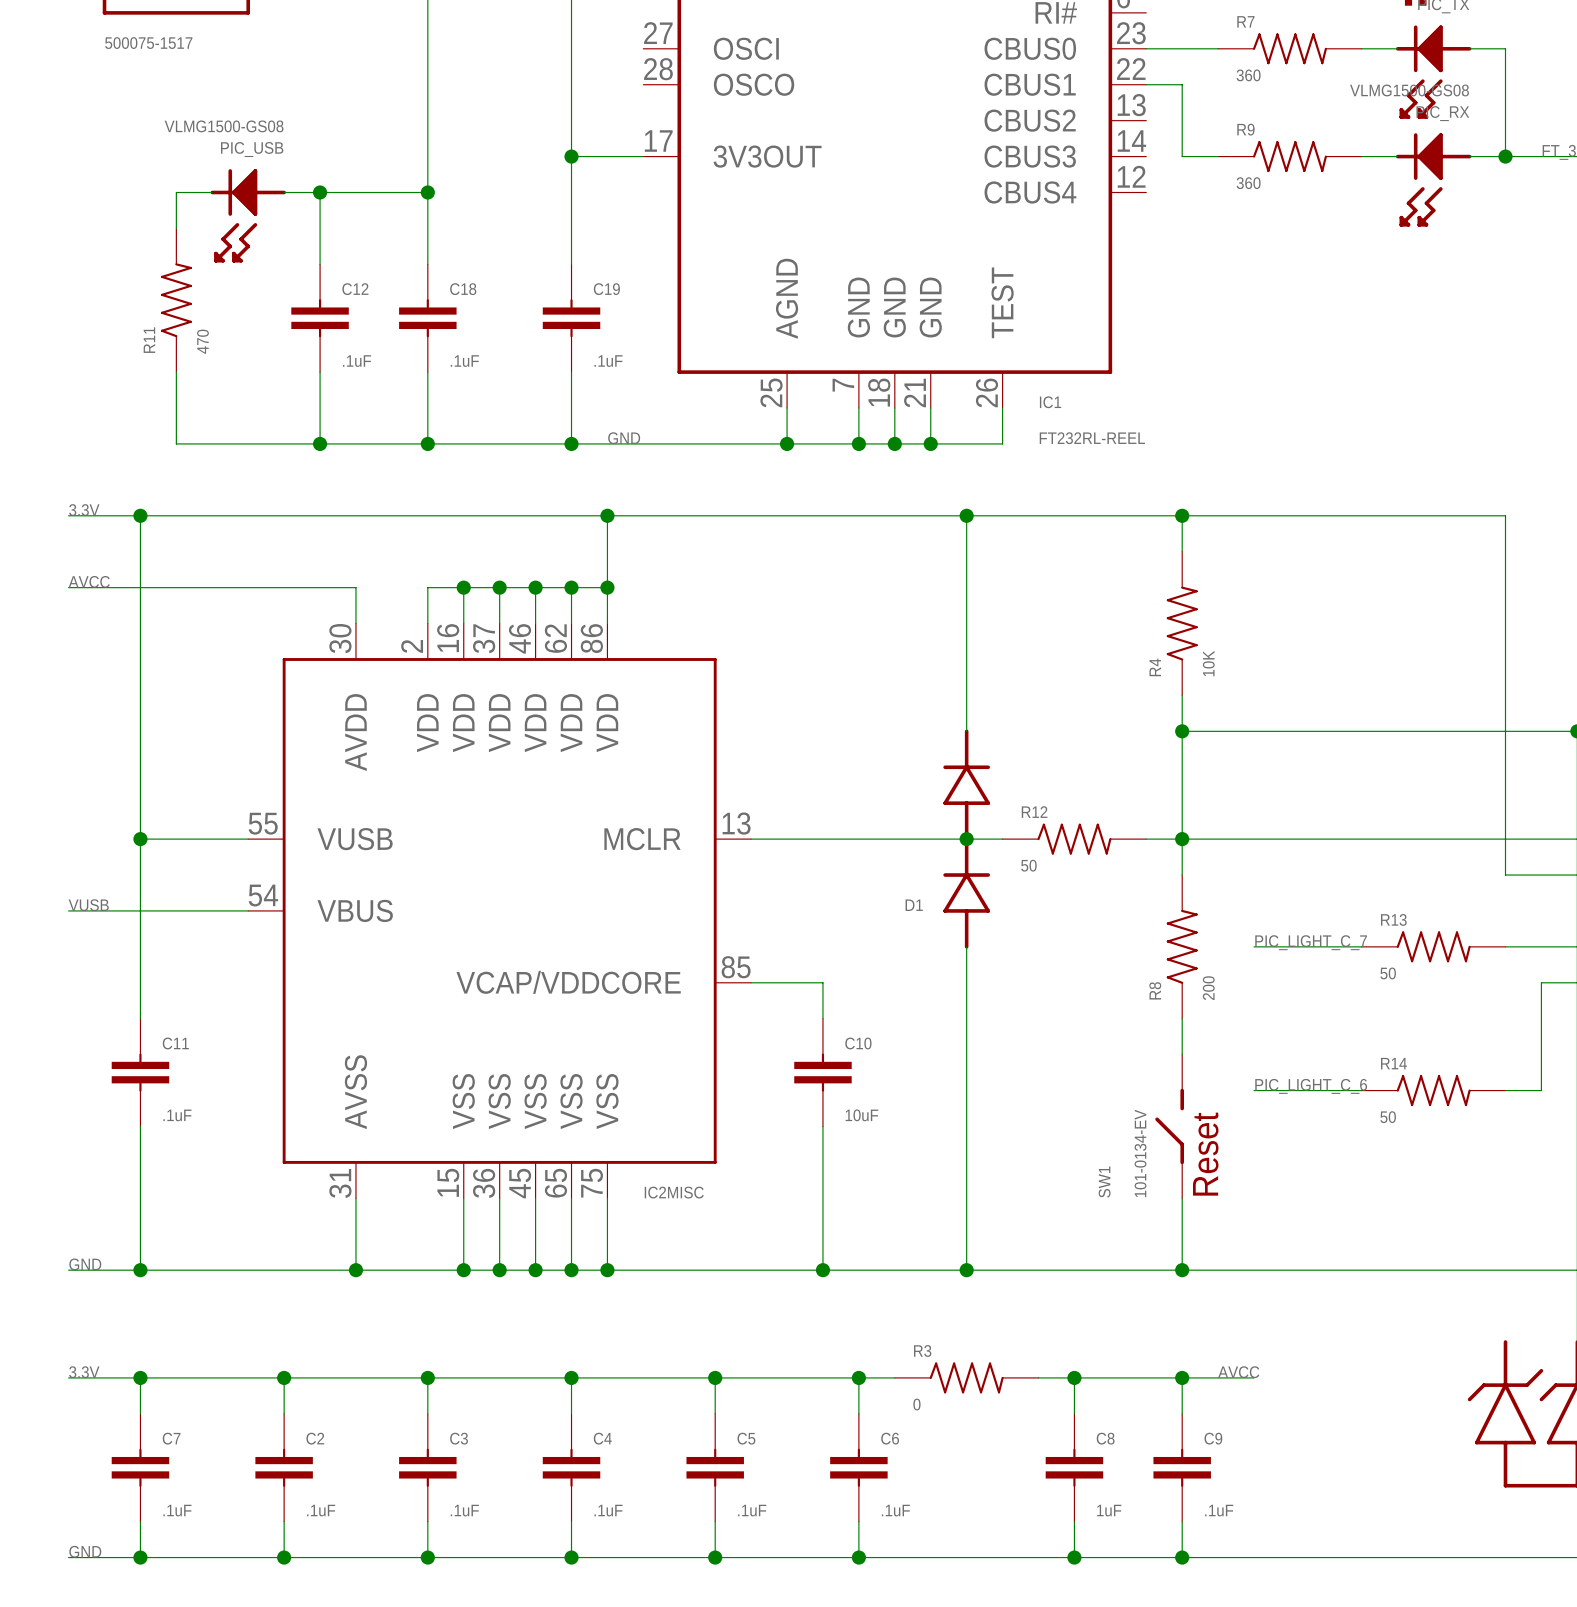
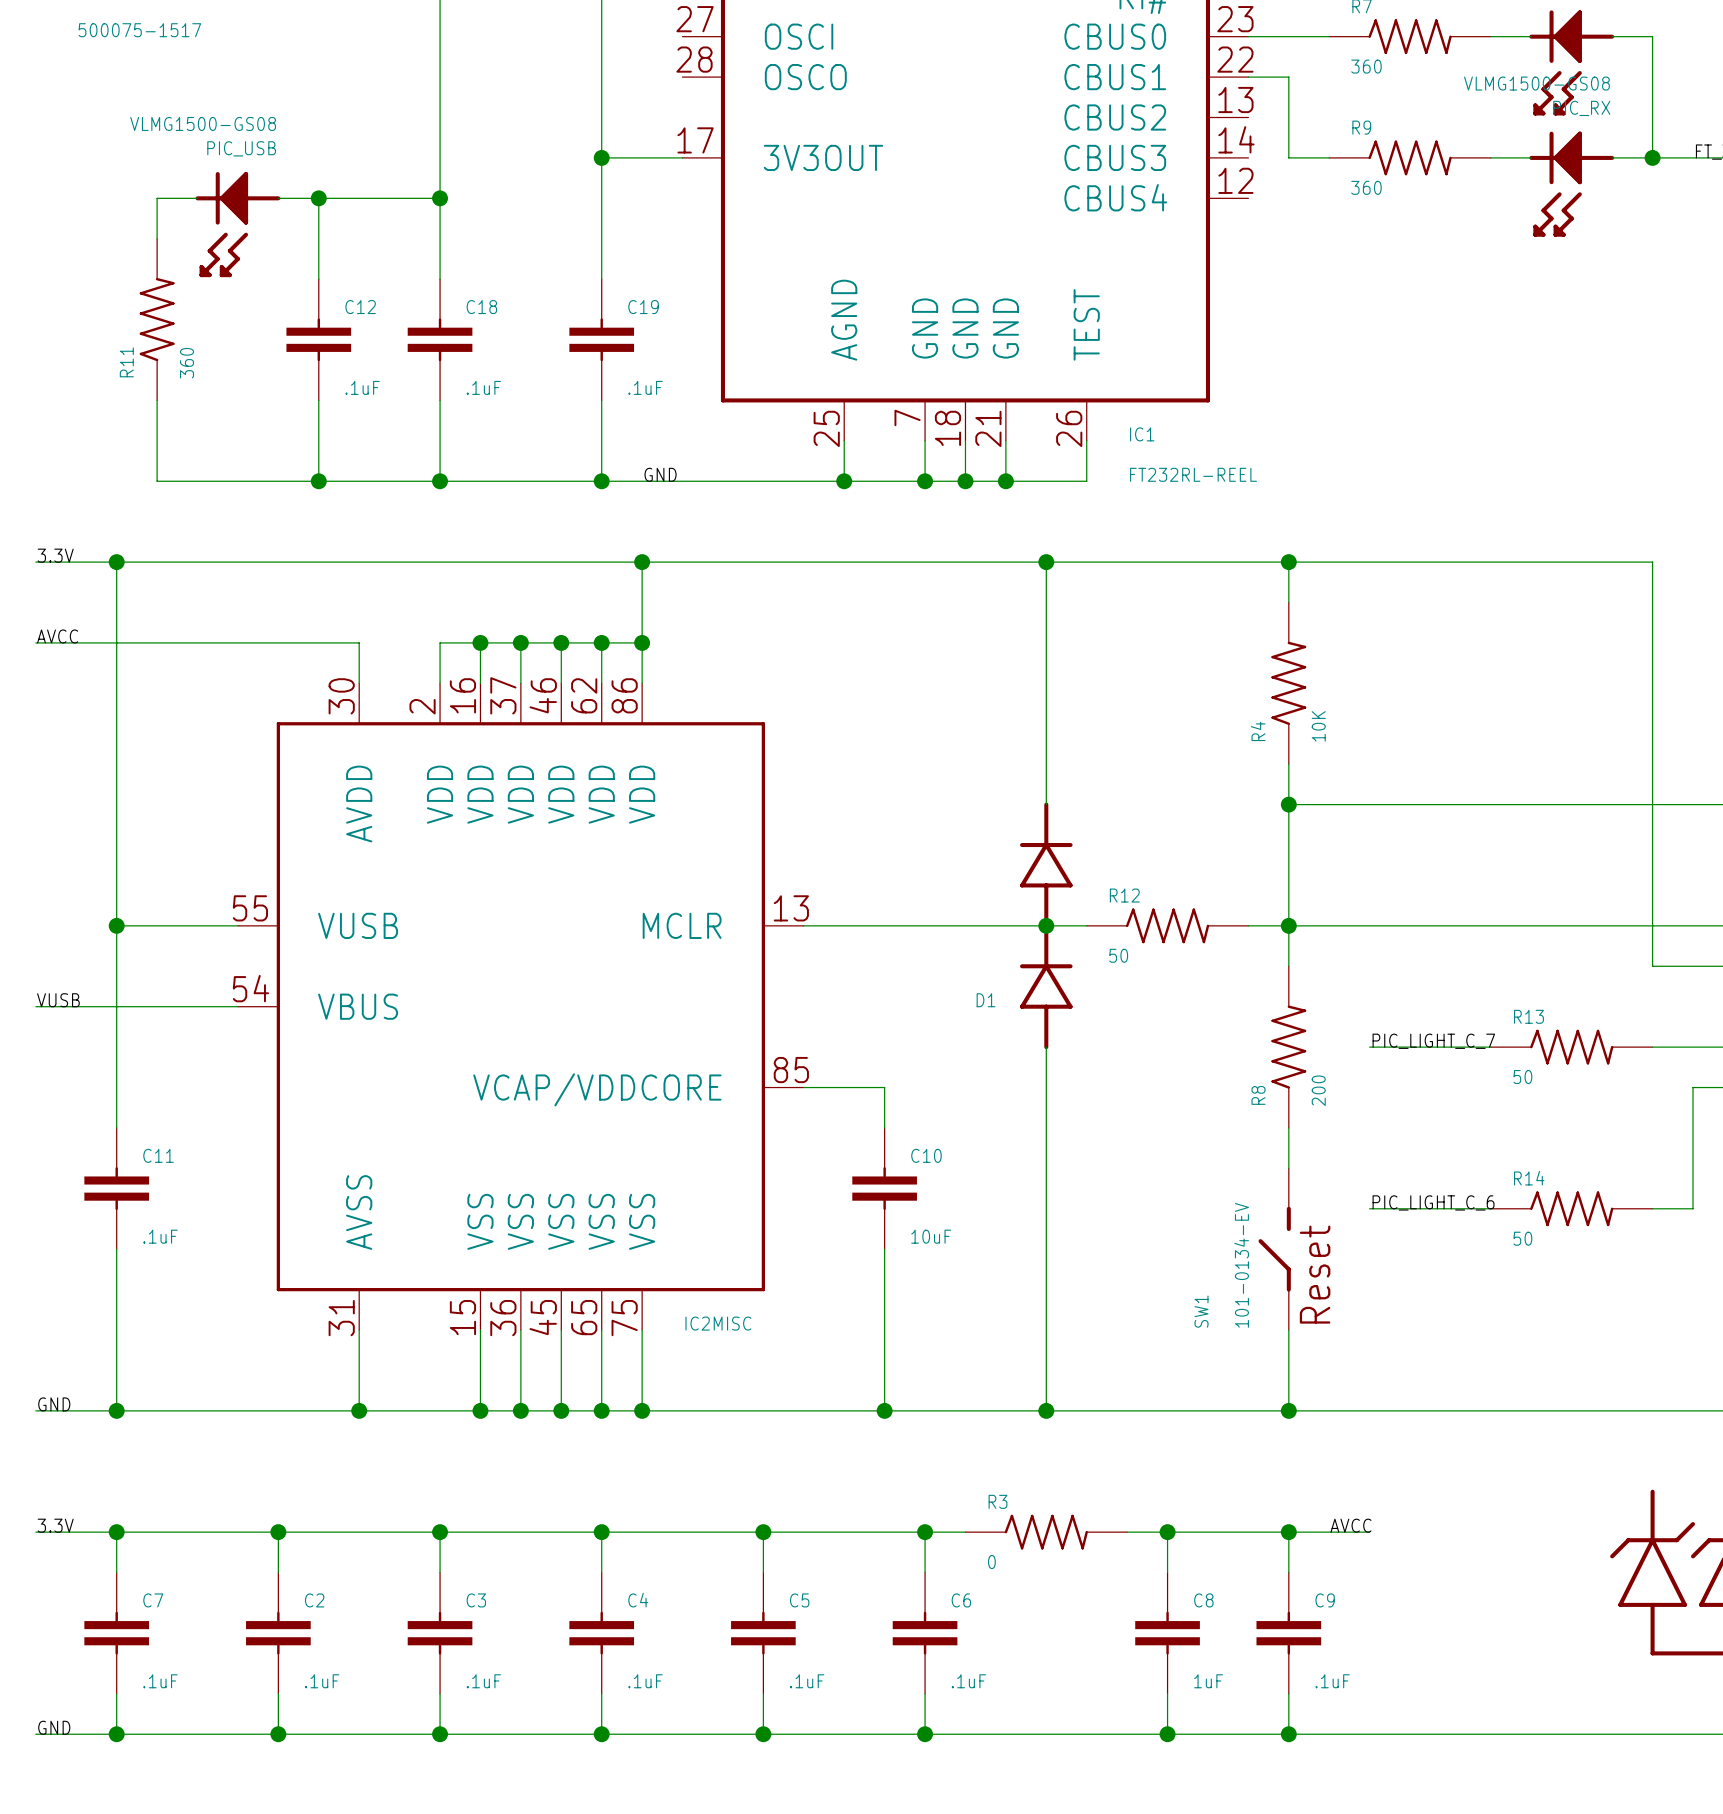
R11 value: 470 (202, 341) -> 360 (187, 363)

